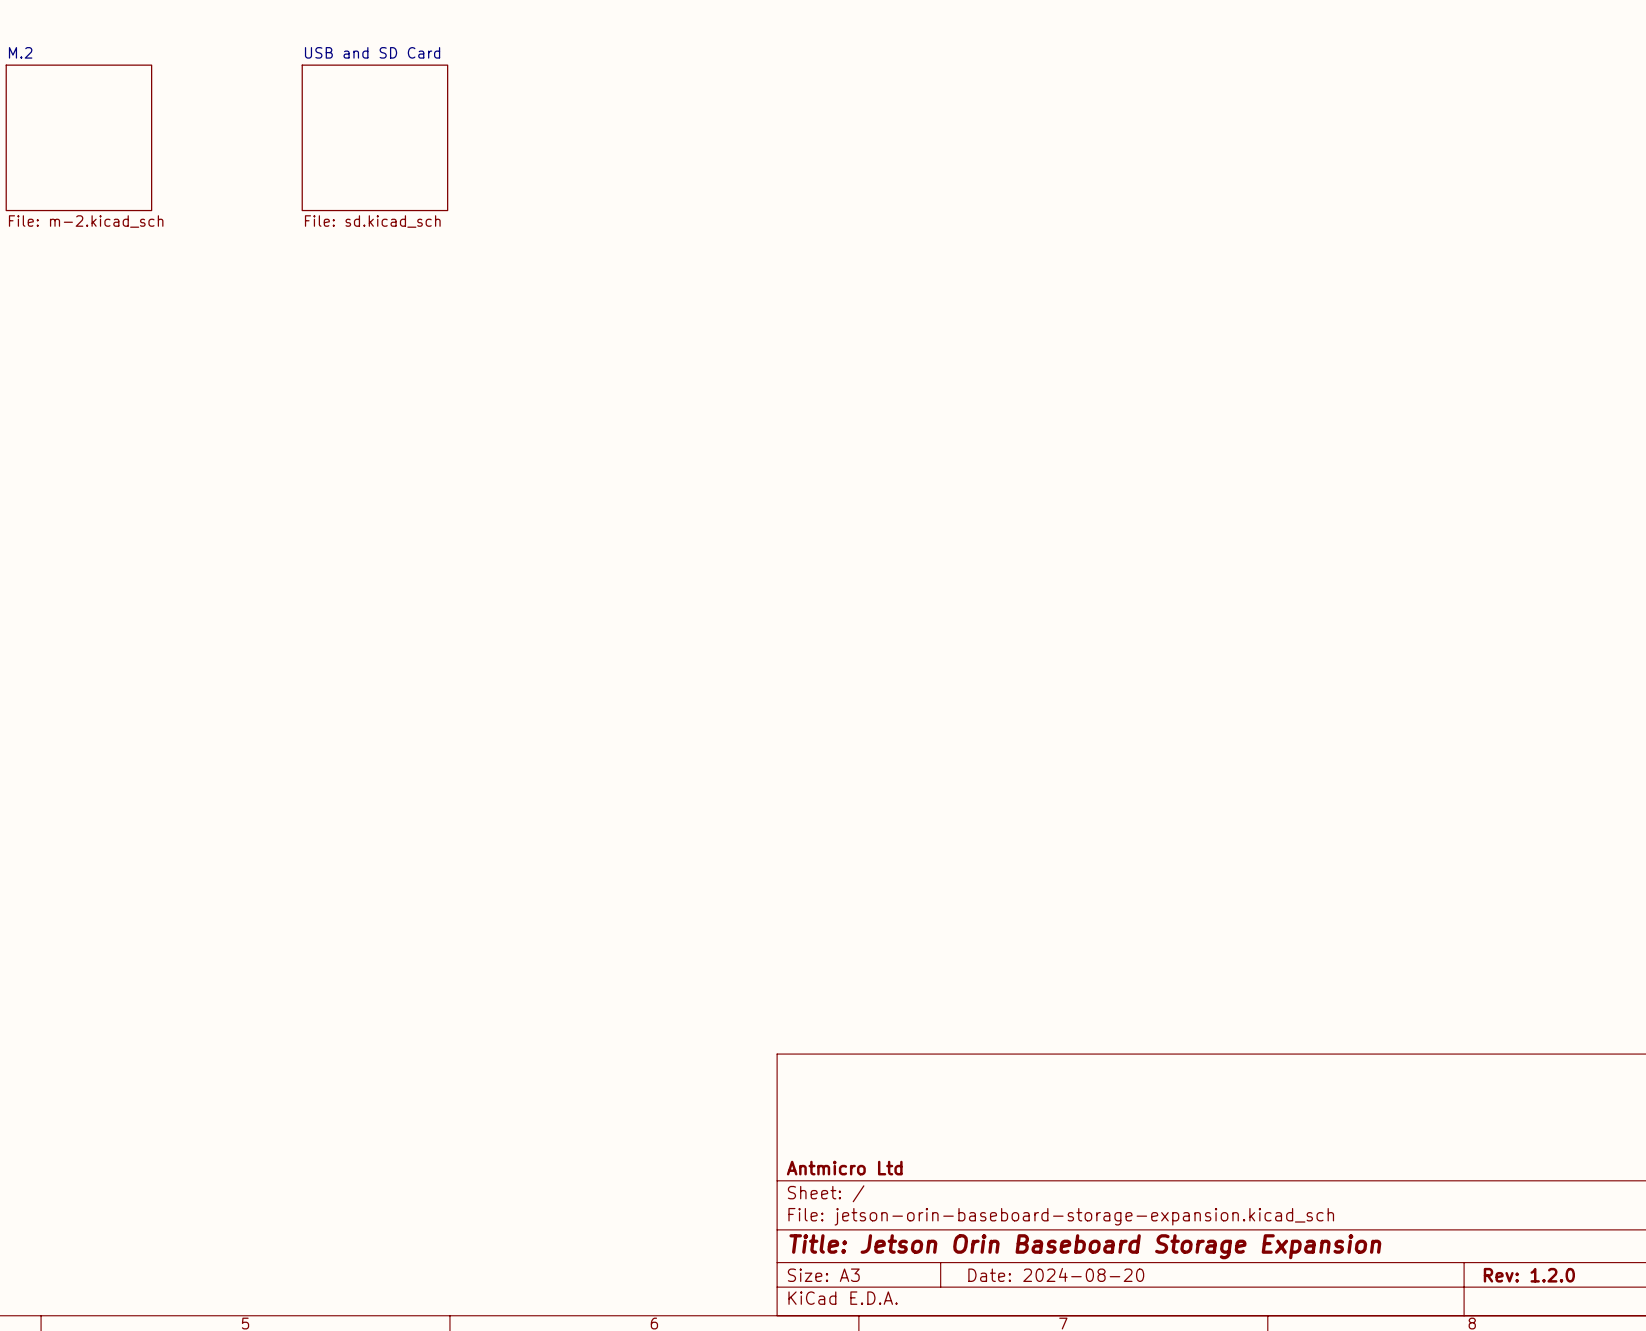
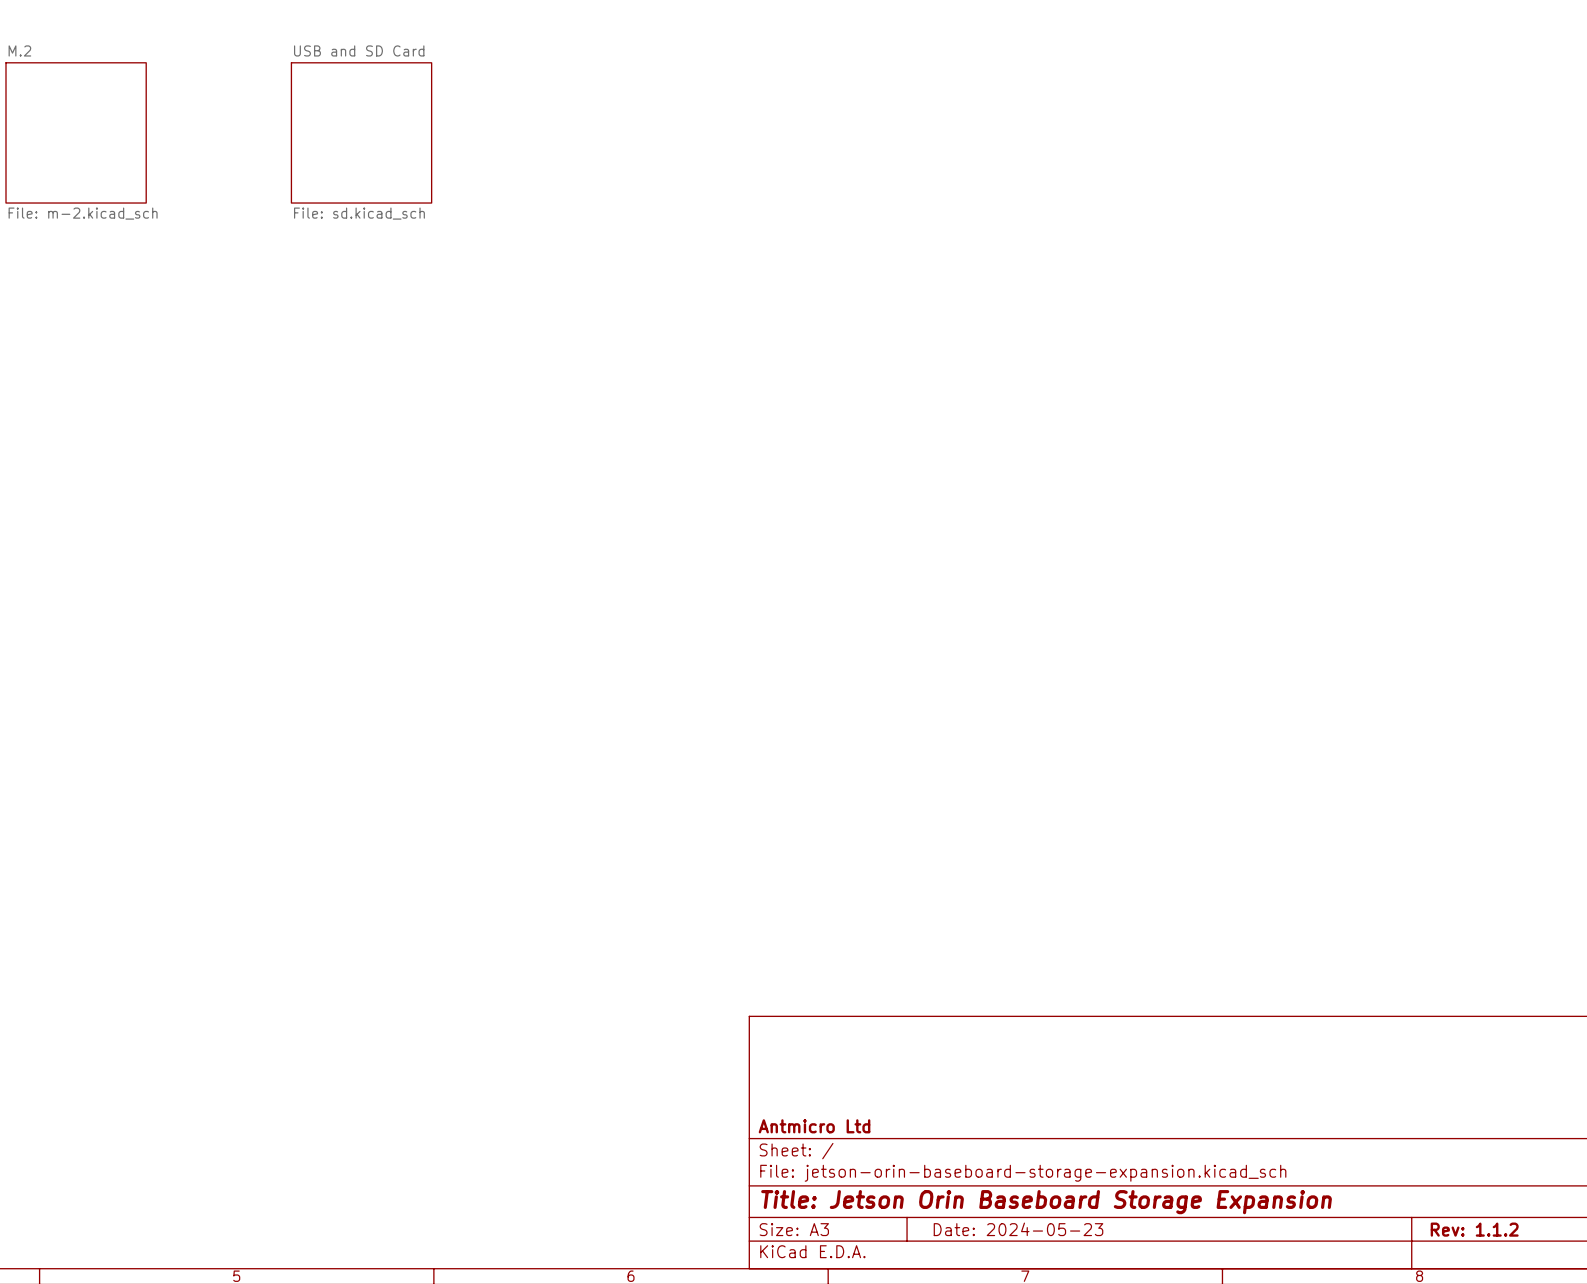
title block: Date: 2024-08-20 (1056, 1274) -> Date: 2024-05-23 (1018, 1229)
title block: Rev: 1.2.0 (1529, 1275) -> Rev: 1.1.2 (1474, 1229)

